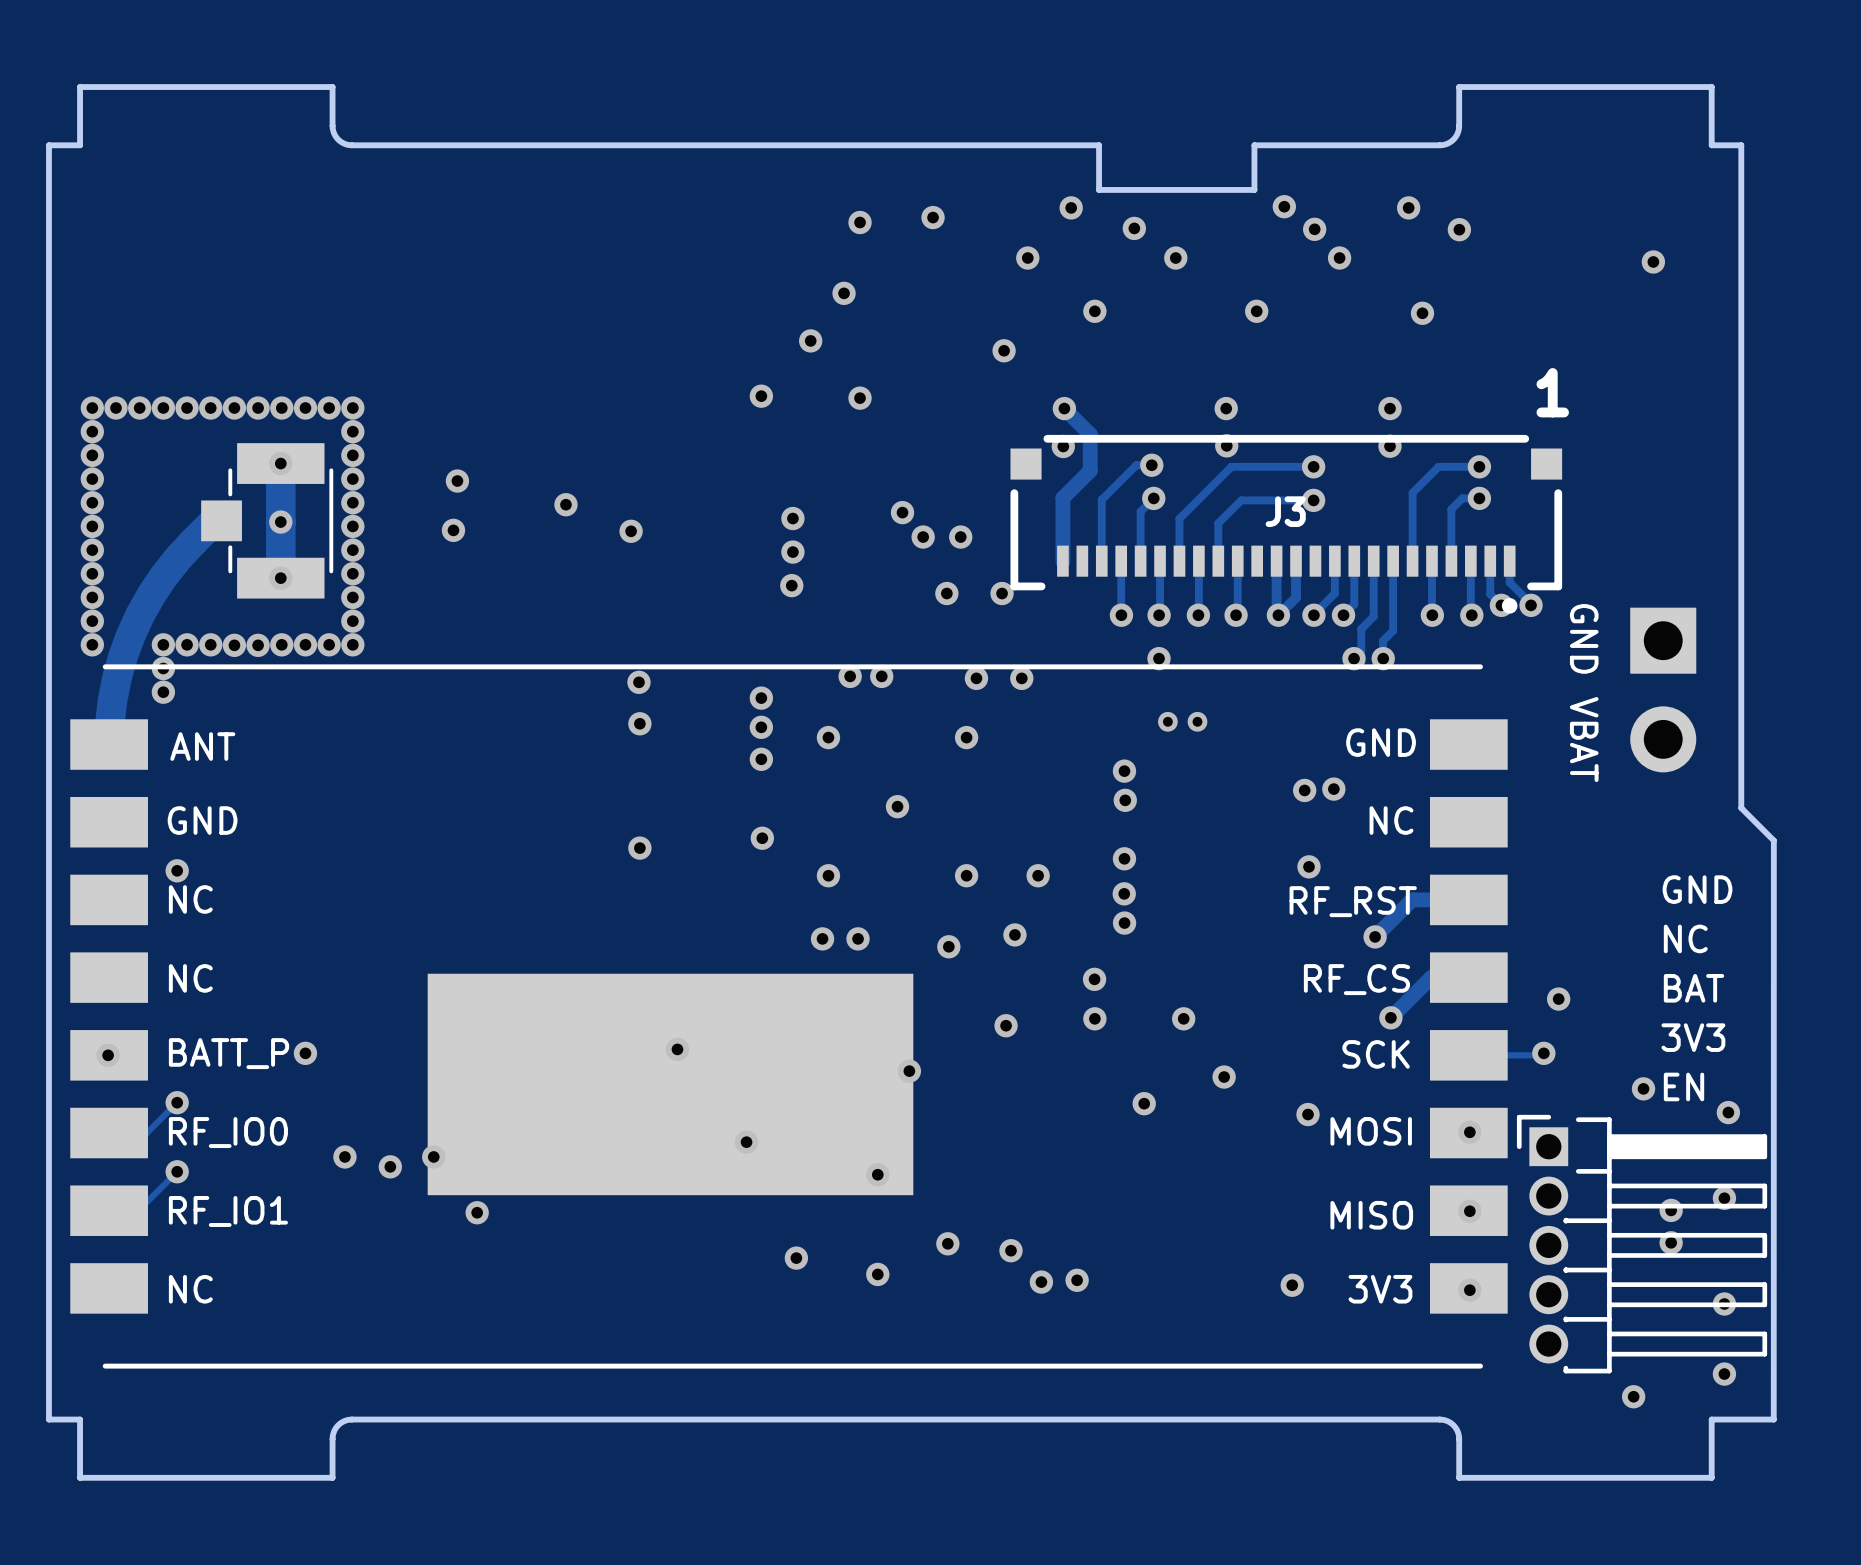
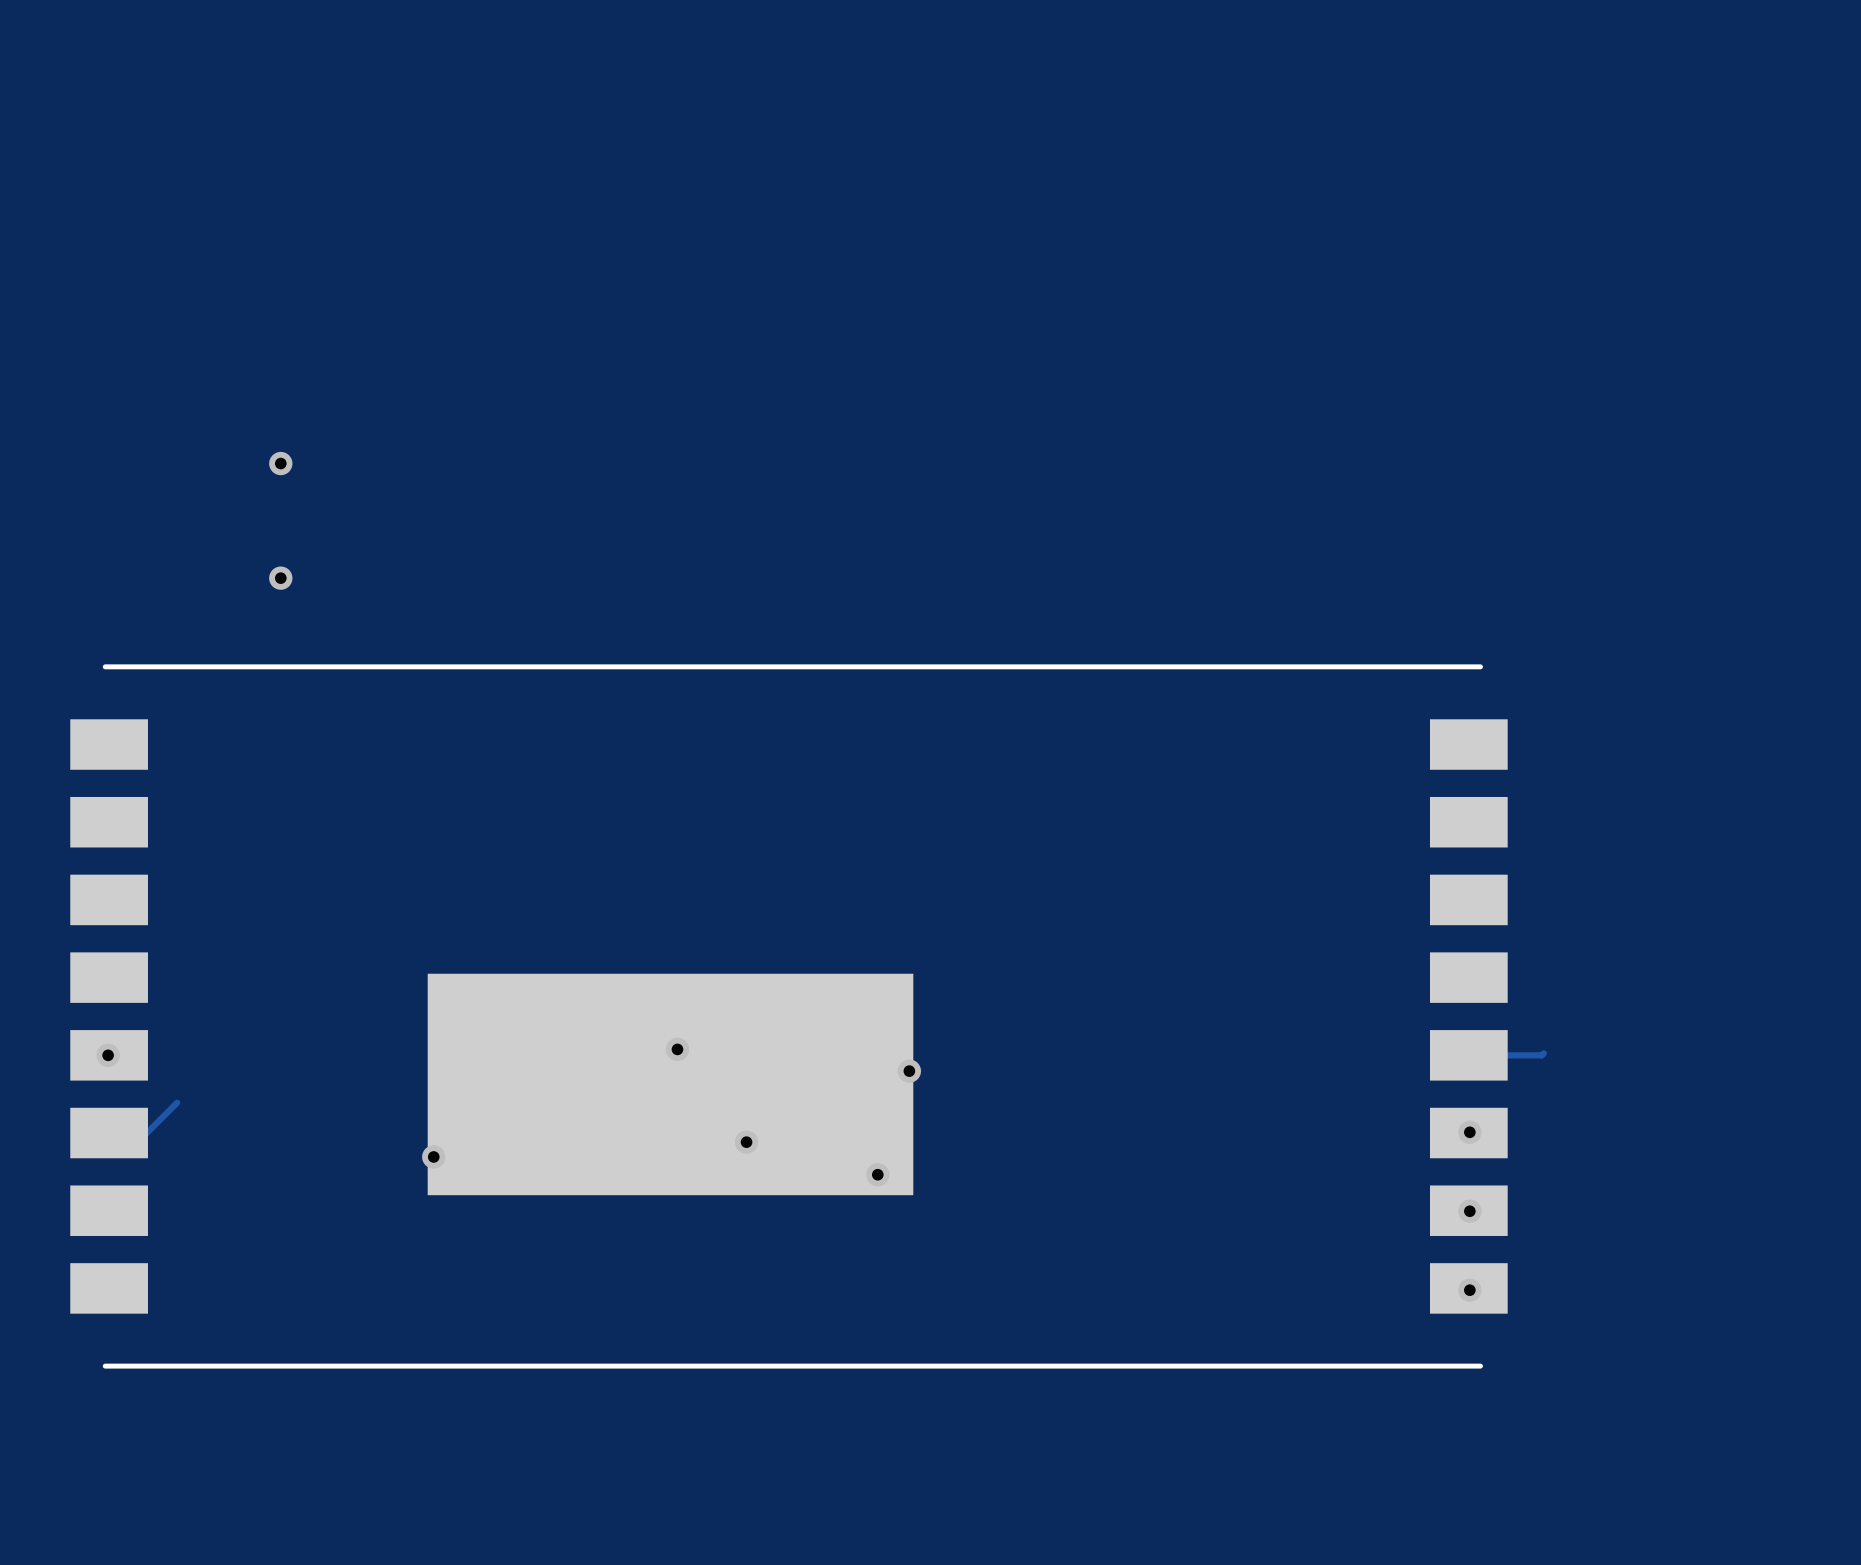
board edge: (1711, 87) (1459, 87) (1459, 128) (1456, 135) (1449, 142) (1439, 145) (1254, 145) (1254, 189) (1099, 189) (1099, 145) (349, 145) (340, 141) (333, 130) (332, 87) (80, 87) (80, 145) (48, 145) (48, 1419) (80, 1419) (80, 1477) (332, 1477) (333, 1433) (340, 1423) (351, 1419) (1439, 1419) (1451, 1423) (1458, 1433) (1459, 1477) (1711, 1477) (1711, 1419) (1773, 1419) (1773, 840) (1741, 808) (1741, 145) (1711, 145) (1711, 87) -> none
via: (1284, 206) -> none
via: (1071, 207) -> none
via: (1408, 207) -> none
via: (933, 217) -> none
via: (860, 222) -> none
via: (1134, 228) -> none
via: (1314, 229) -> none
via: (1459, 229) -> none
via: (1027, 258) -> none
via: (1175, 258) -> none
via: (1339, 258) -> none
via: (1653, 261) -> none
via: (844, 293) -> none
via: (1094, 311) -> none
via: (1256, 311) -> none
via: (1422, 313) -> none
via: (810, 340) -> none
via: (1004, 350) -> none
text: 1 (1552, 392) -> none
via: (761, 396) -> none
via: (860, 398) -> none
via: (92, 408) -> none
via: (116, 408) -> none
via: (139, 408) -> none
via: (163, 408) -> none
via: (187, 408) -> none
via: (210, 408) -> none
via: (234, 408) -> none
via: (258, 408) -> none
via: (281, 408) -> none
via: (305, 408) -> none
via: (329, 408) -> none
via: (352, 408) -> none
track: (1064, 408) (1090, 434) (1090, 470) (1062, 498) (1062, 561) -> none
via: (1064, 408) -> none
via: (1226, 408) -> none
via: (1390, 408) -> none
via: (92, 431) -> none
via: (352, 431) -> none
via: (1226, 445) -> none
via: (1063, 446) -> none
via: (1390, 446) -> none
via: (92, 455) -> none
via: (352, 455) -> none
track: (280, 463) (280, 578) -> none
track: (1151, 465) (1136, 465) (1101, 499) (1101, 561) -> none
via: (1151, 465) -> none
track: (1313, 466) (1231, 466) (1179, 518) (1179, 561) -> none
via: (1313, 466) -> none
track: (1479, 466) (1438, 466) (1412, 492) (1412, 561) -> none
via: (1479, 466) -> none
via: (92, 479) -> none
via: (352, 479) -> none
via: (457, 481) -> none
track: (1153, 498) (1140, 511) (1140, 561) -> none
via: (1153, 498) -> none
track: (1479, 498) (1462, 498) (1451, 509) (1451, 561) -> none
via: (1479, 498) -> none
track: (1313, 500) (1241, 500) (1218, 523) (1218, 561) -> none
via: (1313, 500) -> none
via: (92, 502) -> none
via: (352, 502) -> none
via: (565, 504) -> none
via: (902, 512) -> none
via: (792, 518) -> none
track: (221, 520) (214, 520) (177, 558) (163, 576) (140, 614) (123, 656) (117, 677) (112, 699) (109, 744) -> none
part: (267, 520) -> none
via: (280, 522) -> none
J3: (1286, 524) -> none
via: (92, 526) -> none
via: (352, 526) -> none
via: (453, 530) -> none
via: (631, 531) -> none
via: (923, 537) -> none
via: (960, 537) -> none
via: (92, 550) -> none
via: (352, 550) -> none
via: (792, 552) -> none
track: (1121, 561) (1121, 615) -> none
track: (1160, 561) (1159, 615) -> none
track: (1198, 561) (1198, 614) -> none
track: (1237, 561) (1237, 613) (1236, 615) -> none
track: (1296, 561) (1296, 597) (1278, 615) (1276, 613) (1276, 561) -> none
track: (1334, 561) (1334, 593) (1313, 615) -> none
track: (1354, 561) (1354, 604) (1343, 615) -> none
track: (1373, 561) (1373, 616) (1361, 629) (1361, 651) (1354, 658) -> none
track: (1393, 561) (1393, 630) (1383, 640) (1383, 658) -> none
track: (1431, 561) (1431, 614) -> none
track: (1470, 561) (1470, 614) -> none
track: (1490, 561) (1490, 594) (1501, 605) -> none
track: (1509, 561) (1509, 582) (1531, 605) -> none
via: (92, 573) -> none
via: (352, 573) -> none
via: (791, 585) -> none
via: (946, 593) -> none
via: (1002, 593) -> none
via: (92, 597) -> none
via: (352, 597) -> none
via: (1501, 605) -> none
via: (1531, 605) -> none
via: (1121, 615) -> none
via: (1159, 615) -> none
via: (1198, 615) -> none
via: (1236, 615) -> none
via: (1278, 615) -> none
via: (1313, 615) -> none
via: (1343, 615) -> none
via: (1432, 615) -> none
via: (1471, 615) -> none
via: (92, 621) -> none
via: (352, 621) -> none
text: GND (1584, 638) -> none
via: (92, 644) -> none
via: (163, 644) -> none
via: (187, 644) -> none
via: (210, 644) -> none
via: (281, 644) -> none
via: (305, 644) -> none
via: (329, 644) -> none
via: (352, 644) -> none
via: (234, 645) -> none
via: (258, 645) -> none
via: (1159, 658) -> none
via: (1354, 658) -> none
via: (1383, 658) -> none
via: (163, 668) -> none
via: (850, 676) -> none
via: (881, 676) -> none
via: (976, 678) -> none
via: (1021, 678) -> none
via: (638, 682) -> none
part: (1663, 690) -> none
via: (163, 692) -> none
via: (761, 698) -> none
via: (1167, 721) -> none
via: (1197, 721) -> none
via: (639, 723) -> none
via: (761, 727) -> none
via: (828, 737) -> none
via: (966, 737) -> none
text: VBAT (1584, 739) -> none
text: GND (1381, 742) -> none
text: ANT (202, 746) -> none
via: (761, 759) -> none
via: (1124, 771) -> none
via: (1333, 789) -> none
via: (1304, 790) -> none
via: (1125, 800) -> none
via: (897, 806) -> none
text: GND (202, 820) -> none
text: NC (1391, 820) -> none
via: (762, 838) -> none
via: (639, 848) -> none
via: (1124, 858) -> none
via: (1309, 866) -> none
via: (177, 870) -> none
via: (828, 875) -> none
via: (966, 875) -> none
via: (1038, 875) -> none
text: GND (1697, 889) -> none
via: (1124, 893) -> none
text: NC (190, 899) -> none
track: (1468, 899) (1412, 899) (1375, 936) -> none
text: RF_RST (1353, 901) -> none
via: (1124, 923) -> none
via: (1014, 934) -> none
via: (1375, 936) -> none
via: (822, 938) -> none
via: (858, 938) -> none
text: NC (1685, 938) -> none
via: (948, 946) -> none
track: (1468, 977) (1431, 977) (1390, 1017) -> none
text: NC (190, 978) -> none
via: (1094, 979) -> none
text: RF_CS (1356, 979) -> none
text: BAT (1693, 988) -> none
via: (1558, 999) -> none
via: (1390, 1017) -> none
via: (1094, 1018) -> none
via: (1183, 1018) -> none
via: (1006, 1025) -> none
text: 3V3 (1693, 1037) -> none
text: BATT_P (229, 1053) -> none
via: (305, 1053) -> none
via: (1543, 1053) -> none
text: SCK (1376, 1054) -> none
via: (1224, 1077) -> none
text: EN (1684, 1086) -> none
via: (1643, 1088) -> none
via: (177, 1102) -> none
via: (1144, 1103) -> none
via: (1728, 1112) -> none
via: (1308, 1114) -> none
text: MOSI (1371, 1131) -> none
text: RF_IO0 (228, 1132) -> none
via: (344, 1156) -> none
via: (390, 1166) -> none
track: (177, 1171) (138, 1210) -> none
via: (177, 1171) -> none
via: (1724, 1198) -> none
via: (1671, 1210) -> none
text: RF_IO1 (228, 1211) -> none
via: (477, 1212) -> none
text: MISO (1371, 1215) -> none
via: (1671, 1242) -> none
via: (947, 1243) -> none
part: (1642, 1244) -> none
via: (1011, 1250) -> none
via: (796, 1258) -> none
via: (877, 1274) -> none
via: (1077, 1280) -> none
via: (1041, 1282) -> none
via: (1292, 1285) -> none
text: NC (190, 1289) -> none
text: 3V3 (1380, 1289) -> none
via: (1724, 1303) -> none
via: (1724, 1374) -> none
via: (1633, 1396) -> none

